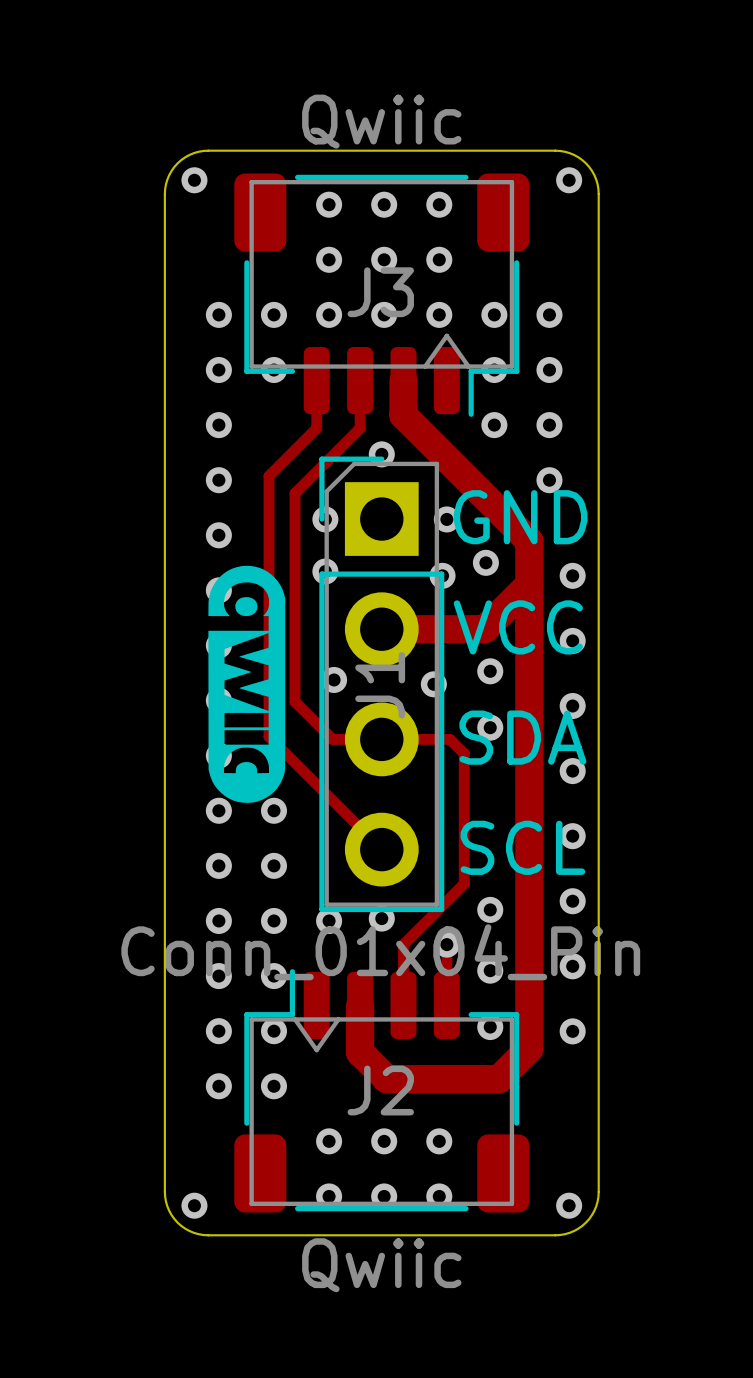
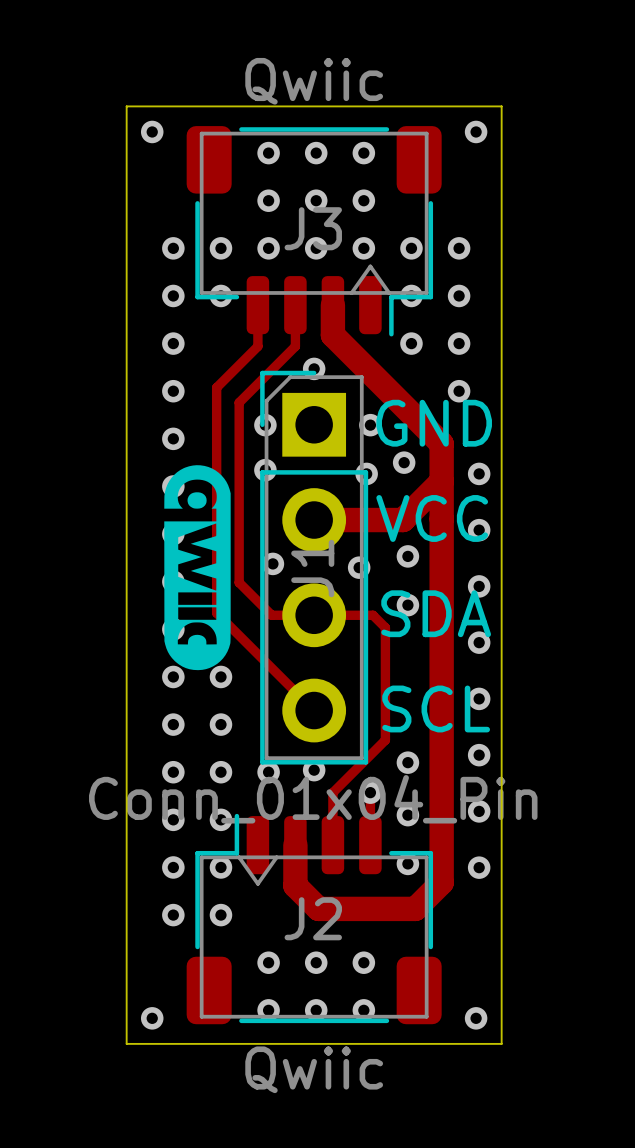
board edge: (208, 150) (189, 154) (177, 163) (169, 175) (164, 194) -> (164, 106) (126, 106) (126, 143)
board edge: (555, 150) (574, 154) (586, 163) (596, 179) (598, 194) -> (464, 106) (501, 106) (501, 143)
board edge: (164, 1191) (169, 1210) (177, 1222) (193, 1232) (208, 1235) -> (126, 1006) (126, 1043) (164, 1043)
board edge: (598, 1191) (594, 1210) (586, 1222) (574, 1230) (555, 1235) -> (501, 1006) (501, 1043) (464, 1043)

